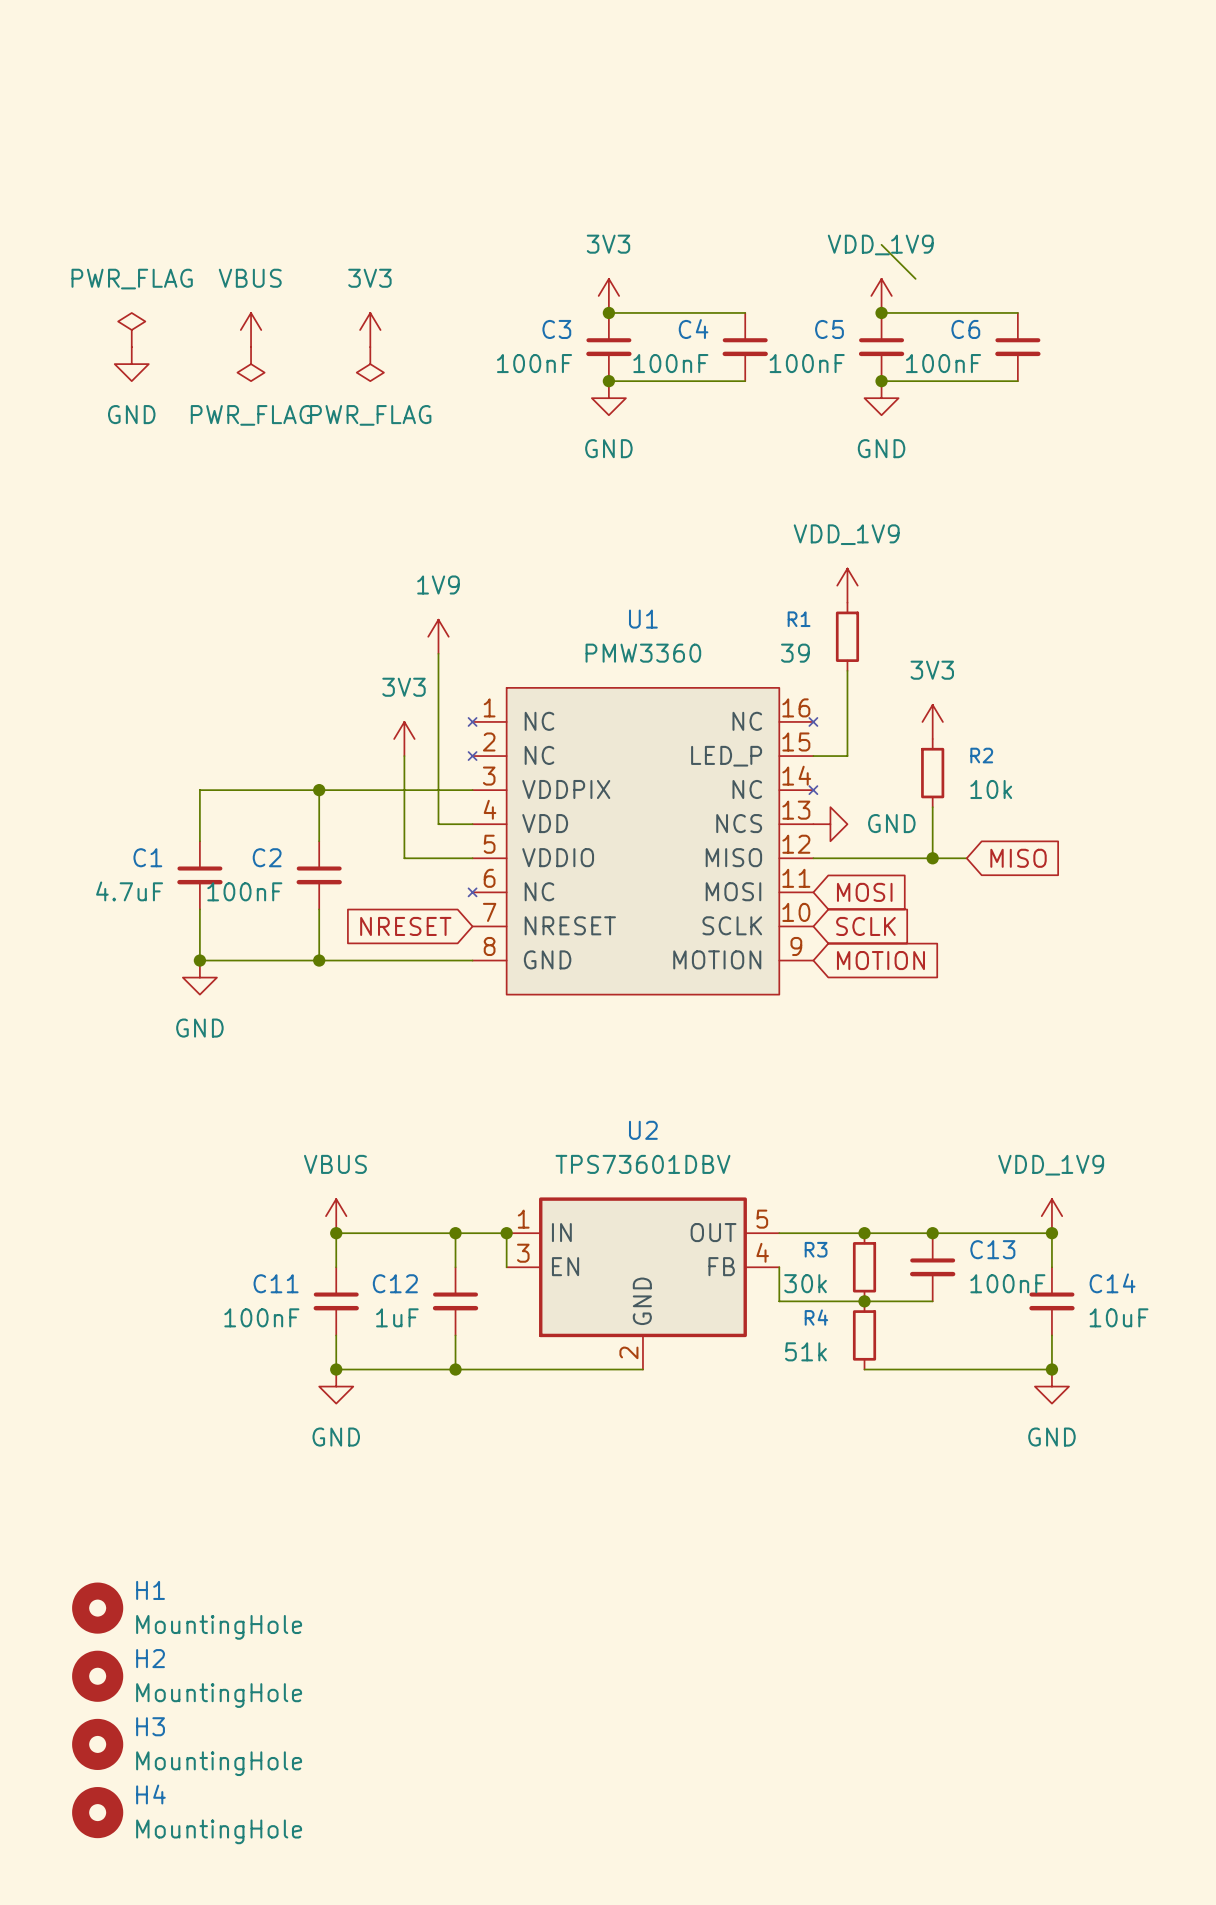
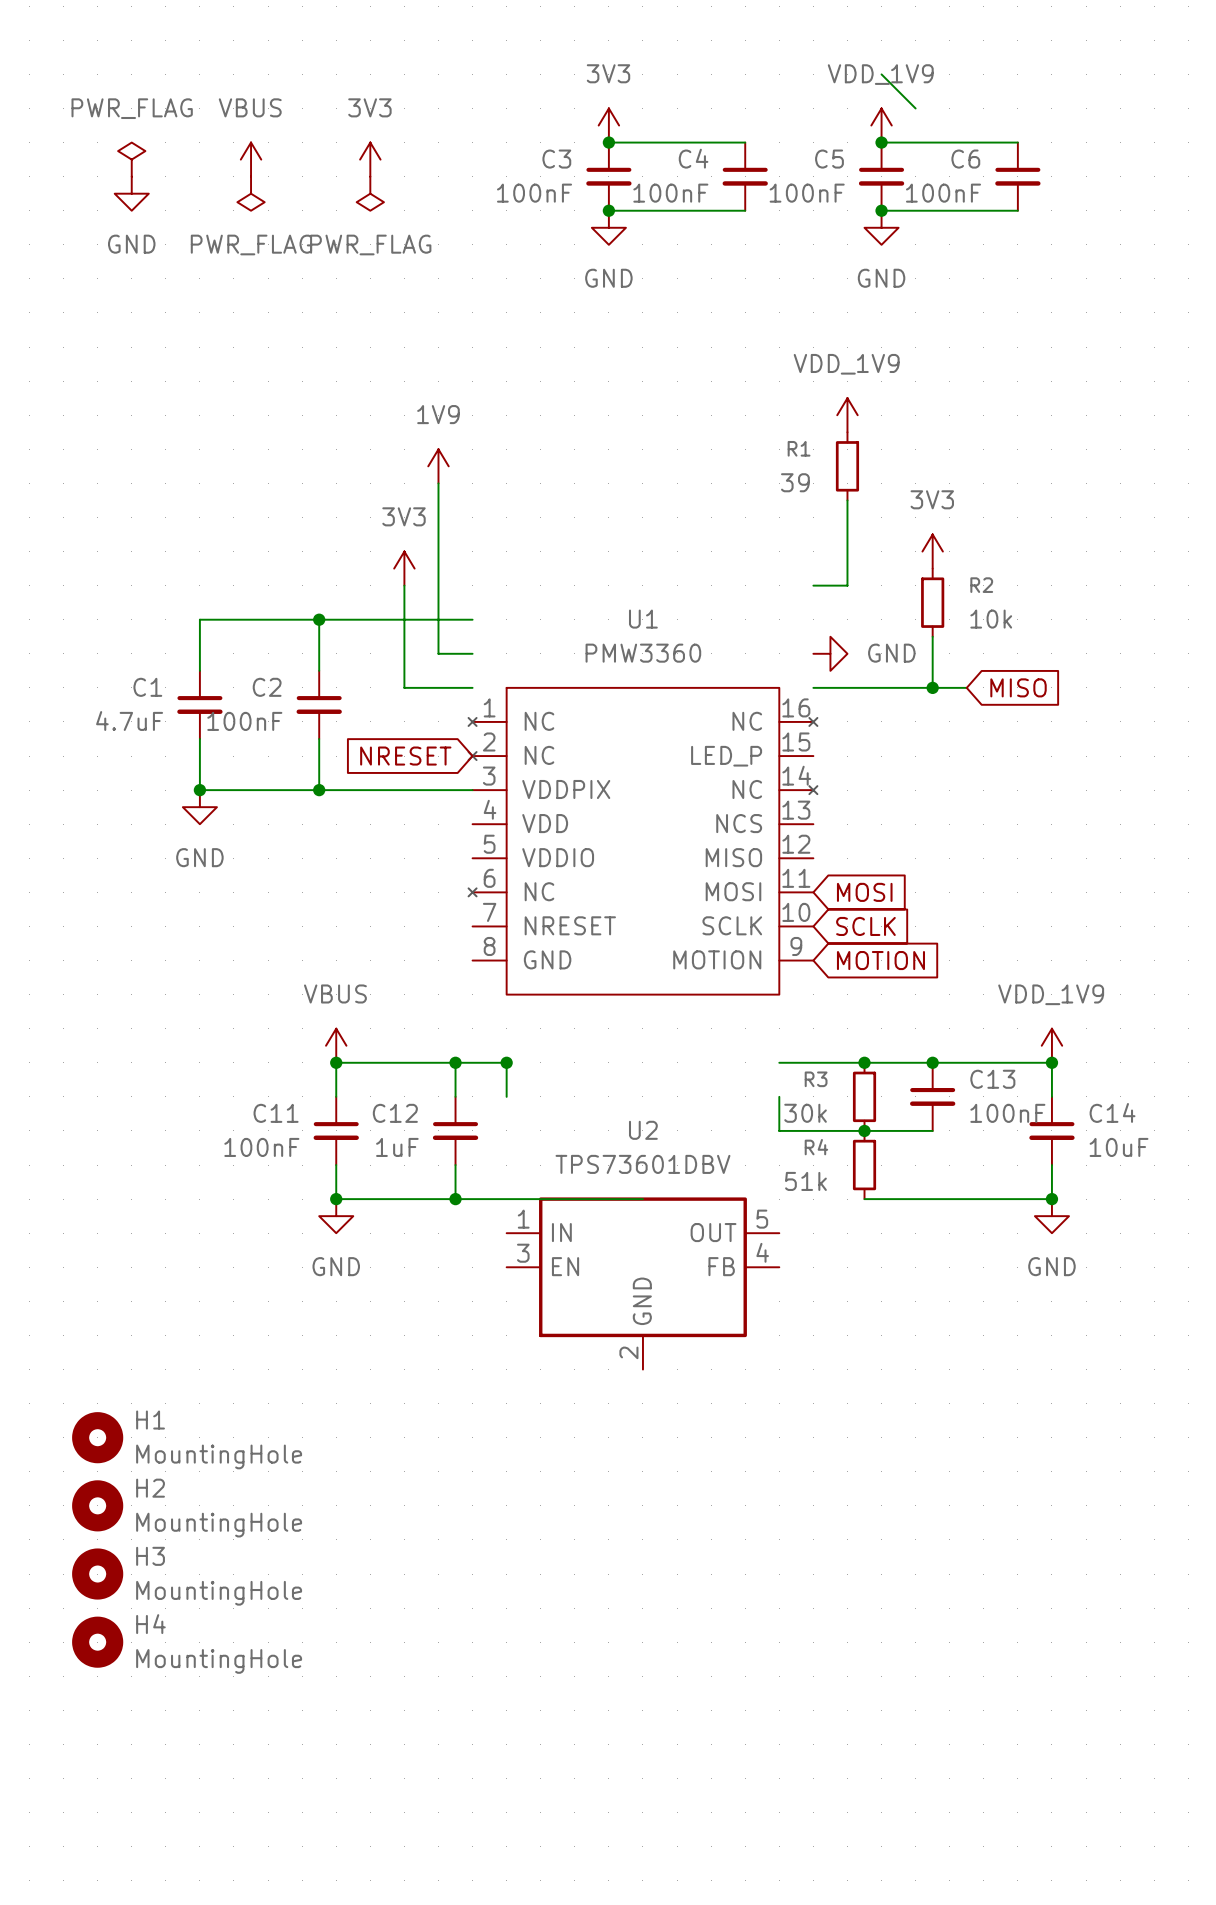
power symbol: none -> 3V3 (608, 125)
power symbol: none -> VDD_1V9 (881, 125)
junction: none -> (608, 142)
junction: none -> (881, 142)
power symbol: none -> PWR_FLAG (131, 159)
power symbol: none -> 3V3 (370, 159)
power symbol: none -> PWR_FLAG (251, 193)
power symbol: none -> PWR_FLAG (370, 193)
junction: none -> (608, 210)
junction: none -> (881, 210)
power symbol: none -> GND (608, 227)
power symbol: none -> GND (881, 227)
wire: (881, 244) (915, 278) -> (881, 74) (915, 108)
power symbol: 3V3 (608, 295) -> none
power symbol: VDD_1V9 (881, 295) -> none
wire: (608, 312) (745, 312) -> (608, 142) (745, 142)
junction: (608, 312) -> none
wire: (881, 312) (1017, 312) -> (881, 142) (1017, 142)
junction: (881, 312) -> none
power symbol: PWR_FLAG (131, 330) -> none
power symbol position: VBUS (251, 330) -> VBUS (251, 159)
power symbol: 3V3 (370, 330) -> none
C3 position: (608, 347) -> (608, 176)
C4 position: (745, 347) -> (745, 176)
C5 position: (881, 347) -> (881, 176)
C6 position: (1017, 347) -> (1017, 176)
power symbol position: GND (131, 364) -> GND (131, 193)
power symbol: PWR_FLAG (251, 364) -> none
power symbol: PWR_FLAG (370, 364) -> none
wire: (608, 381) (745, 381) -> (608, 210) (745, 210)
junction: (608, 381) -> none
wire: (881, 381) (1017, 381) -> (881, 210) (1017, 210)
junction: (881, 381) -> none
power symbol: GND (608, 398) -> none
power symbol: GND (881, 398) -> none
power symbol: none -> VDD_1V9 (847, 415)
power symbol: none -> 3V3 (404, 568)
power symbol: VDD_1V9 (847, 585) -> none
junction: none -> (319, 619)
wire: none -> (472, 619) (199, 619) (199, 670)
power symbol position: 1V9 (438, 636) -> 1V9 (438, 466)
R1 position: (847, 636) -> (847, 466)
wire: (438, 653) (438, 824) (472, 824) -> (438, 483) (438, 653) (472, 653)
power symbol: none -> GND (830, 653)
wire: (847, 670) (847, 756) (813, 756) -> (847, 500) (847, 585) (813, 585)
junction: none -> (932, 687)
power symbol position: 3V3 (932, 721) -> 3V3 (932, 551)
power symbol: 3V3 (404, 739) -> none
wire: (404, 756) (404, 858) (472, 858) -> (404, 585) (404, 687) (472, 687)
R2 position: (932, 773) -> (932, 602)
wire: (199, 790) (199, 841) -> (199, 790) (199, 739)
junction: none -> (199, 790)
wire: (319, 790) (319, 841) -> (319, 790) (319, 739)
wire: (932, 807) (932, 858) -> (932, 636) (932, 687)
power symbol: GND (830, 824) -> none
wire: (813, 858) (966, 858) -> (813, 687) (966, 687)
junction: (932, 858) -> none
global label position: MISO (1018, 858) -> MISO (1018, 687)
C1 position: (199, 875) -> (199, 704)
C2 position: (319, 875) -> (319, 704)
wire: (199, 909) (199, 960) (472, 960) -> none
wire: (319, 909) (319, 960) -> (319, 619) (319, 670)
global label position: NRESET (405, 926) -> NRESET (405, 756)
junction: (199, 960) -> none
junction: (319, 960) -> none
power symbol position: GND (199, 977) -> GND (199, 807)
power symbol: none -> VBUS (336, 1045)
power symbol: none -> VDD_1V9 (1051, 1045)
junction: none -> (336, 1062)
junction: none -> (455, 1062)
junction: none -> (506, 1062)
junction: none -> (864, 1062)
junction: none -> (932, 1062)
junction: none -> (1051, 1062)
junction: none -> (864, 1130)
junction: none -> (455, 1199)
power symbol: VBUS (336, 1216) -> GND (336, 1216)
power symbol: VDD_1V9 (1051, 1216) -> GND (1051, 1216)
junction position: (336, 1233) -> (336, 1199)
wire: (455, 1233) (455, 1267) -> (455, 1062) (455, 1096)
junction: (455, 1233) -> none
junction: (506, 1233) -> none
wire: (779, 1233) (1051, 1233) (1051, 1267) -> (779, 1062) (1051, 1062) (1051, 1096)
junction: (864, 1233) -> none
junction: (932, 1233) -> none
junction position: (1051, 1233) -> (1051, 1199)
wire: (336, 1267) (336, 1233) (506, 1233) (506, 1267) -> (336, 1096) (336, 1062) (506, 1062) (506, 1096)
wire: (779, 1267) (779, 1301) (932, 1301) -> (779, 1096) (779, 1130) (932, 1130)
R3 position: (864, 1267) -> (864, 1096)
C13 position: (932, 1267) -> (932, 1096)
C11 position: (336, 1301) -> (336, 1130)
C12 position: (455, 1301) -> (455, 1130)
junction: (864, 1301) -> none
C14 position: (1051, 1301) -> (1051, 1130)
wire: (336, 1335) (336, 1369) (642, 1369) -> (336, 1165) (336, 1199) (642, 1199)
wire: (455, 1335) (455, 1369) -> (455, 1165) (455, 1199)
R4 position: (864, 1335) -> (864, 1165)
wire: (1051, 1335) (1051, 1369) (864, 1369) -> (1051, 1165) (1051, 1199) (864, 1199)
junction: (336, 1369) -> none
junction: (455, 1369) -> none
junction: (1051, 1369) -> none
power symbol: GND (336, 1386) -> none
power symbol: GND (1051, 1386) -> none
H1 position: (97, 1608) -> (97, 1437)
H2 position: (97, 1676) -> (97, 1505)
H3 position: (97, 1744) -> (97, 1574)
H4 position: (97, 1812) -> (97, 1642)

